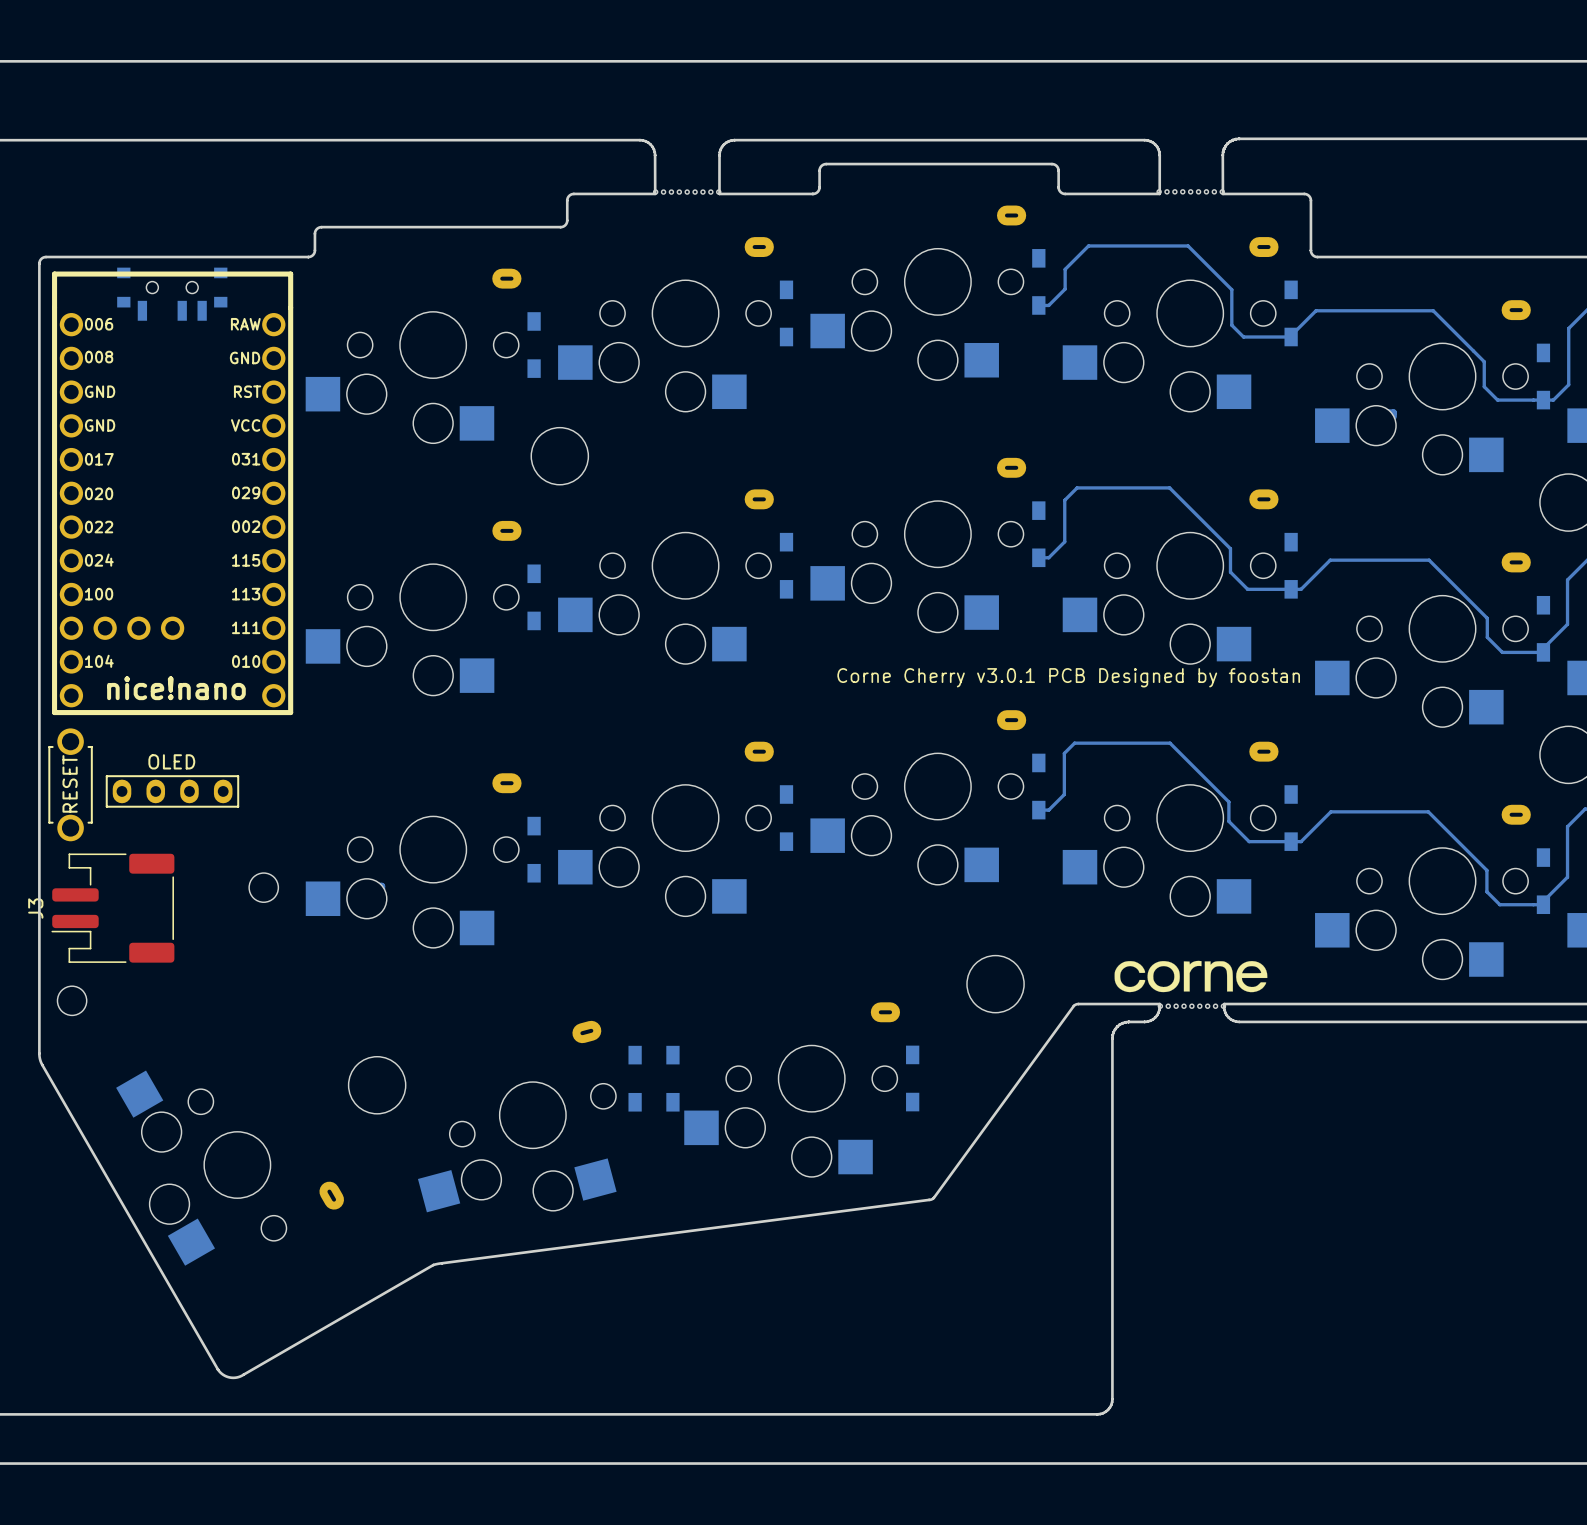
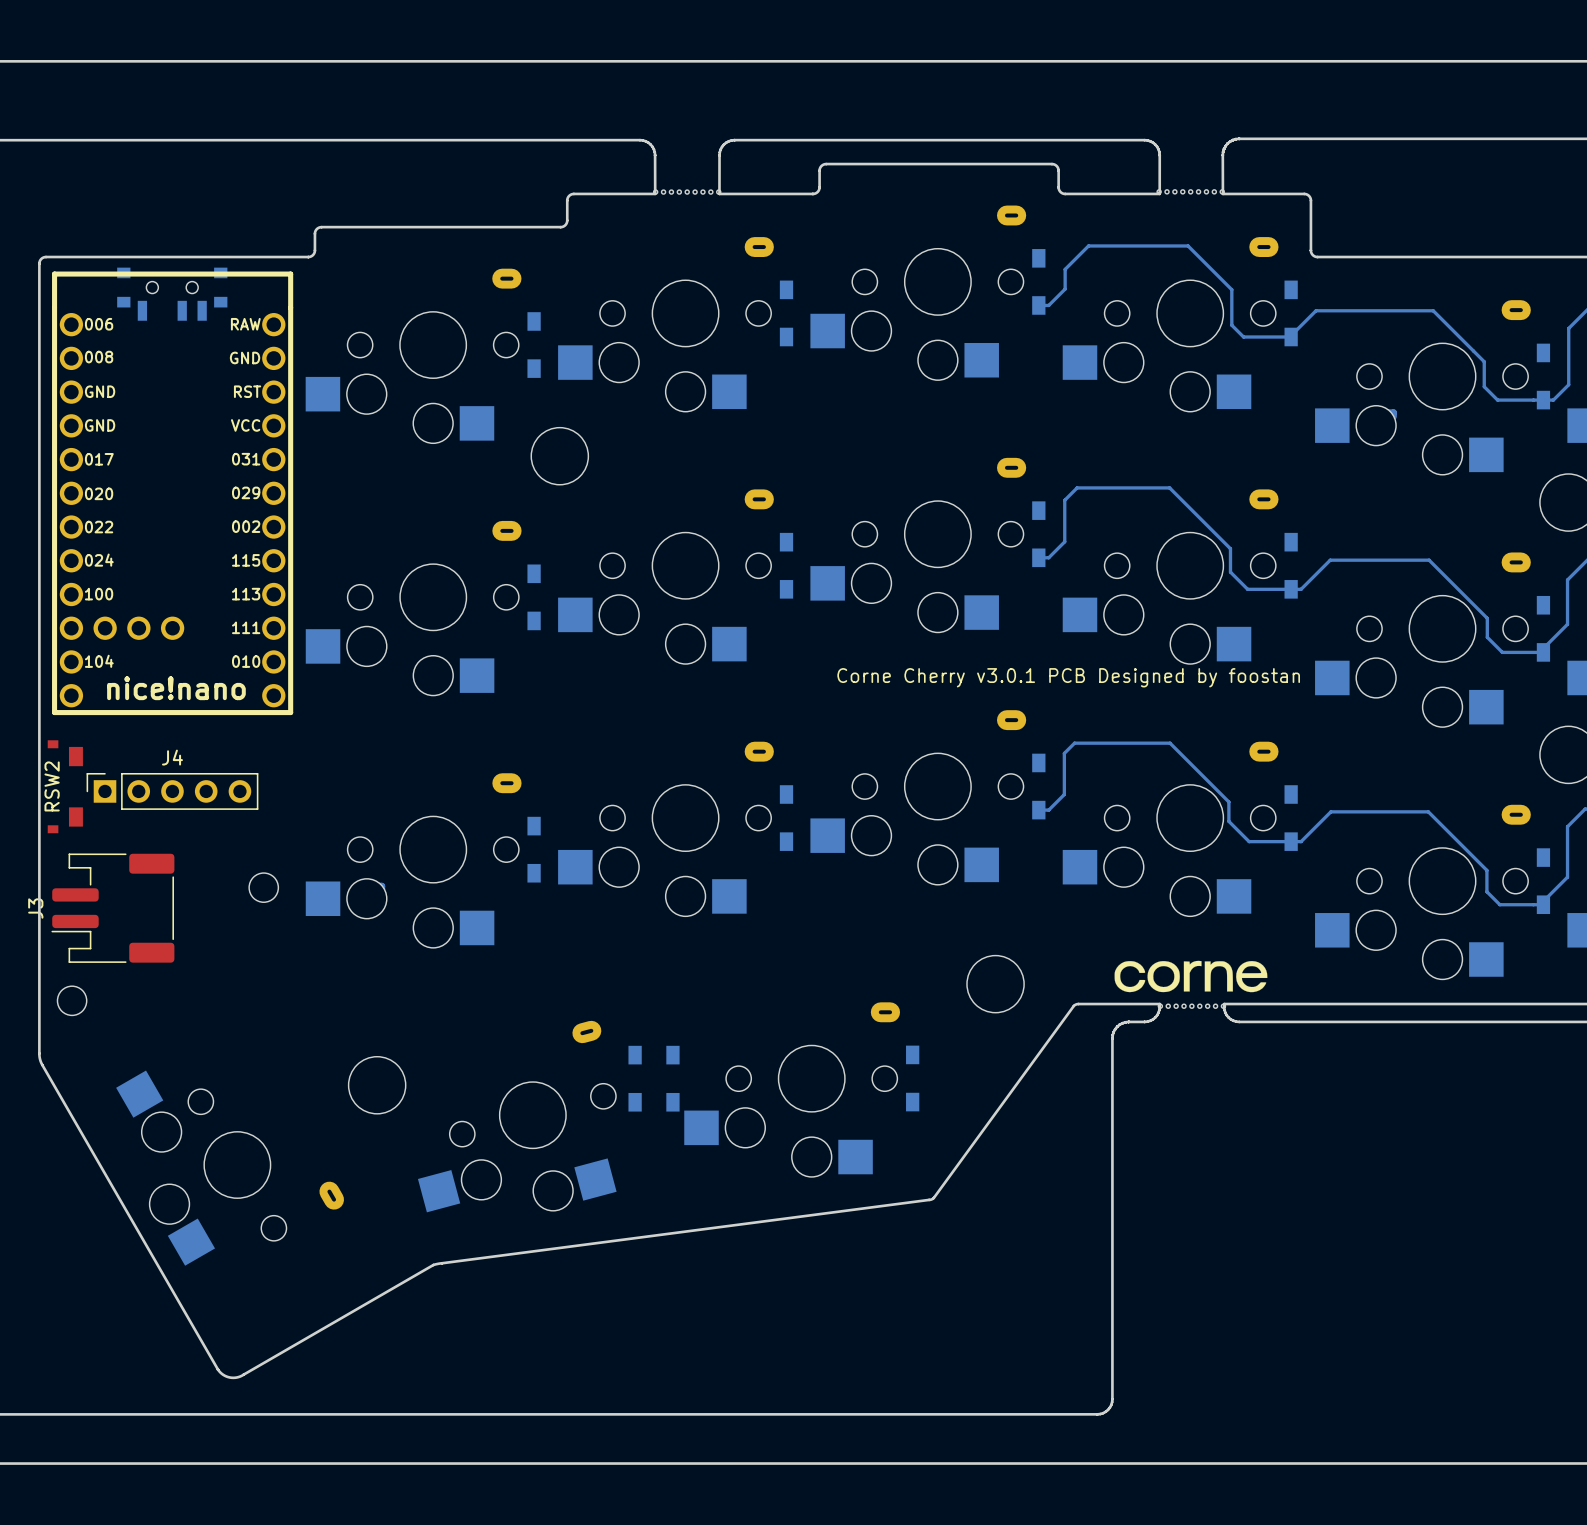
part: (70, 784) -> none
RSW2: none -> (65, 786)
part: (172, 791) -> none
J4: none -> (172, 791)

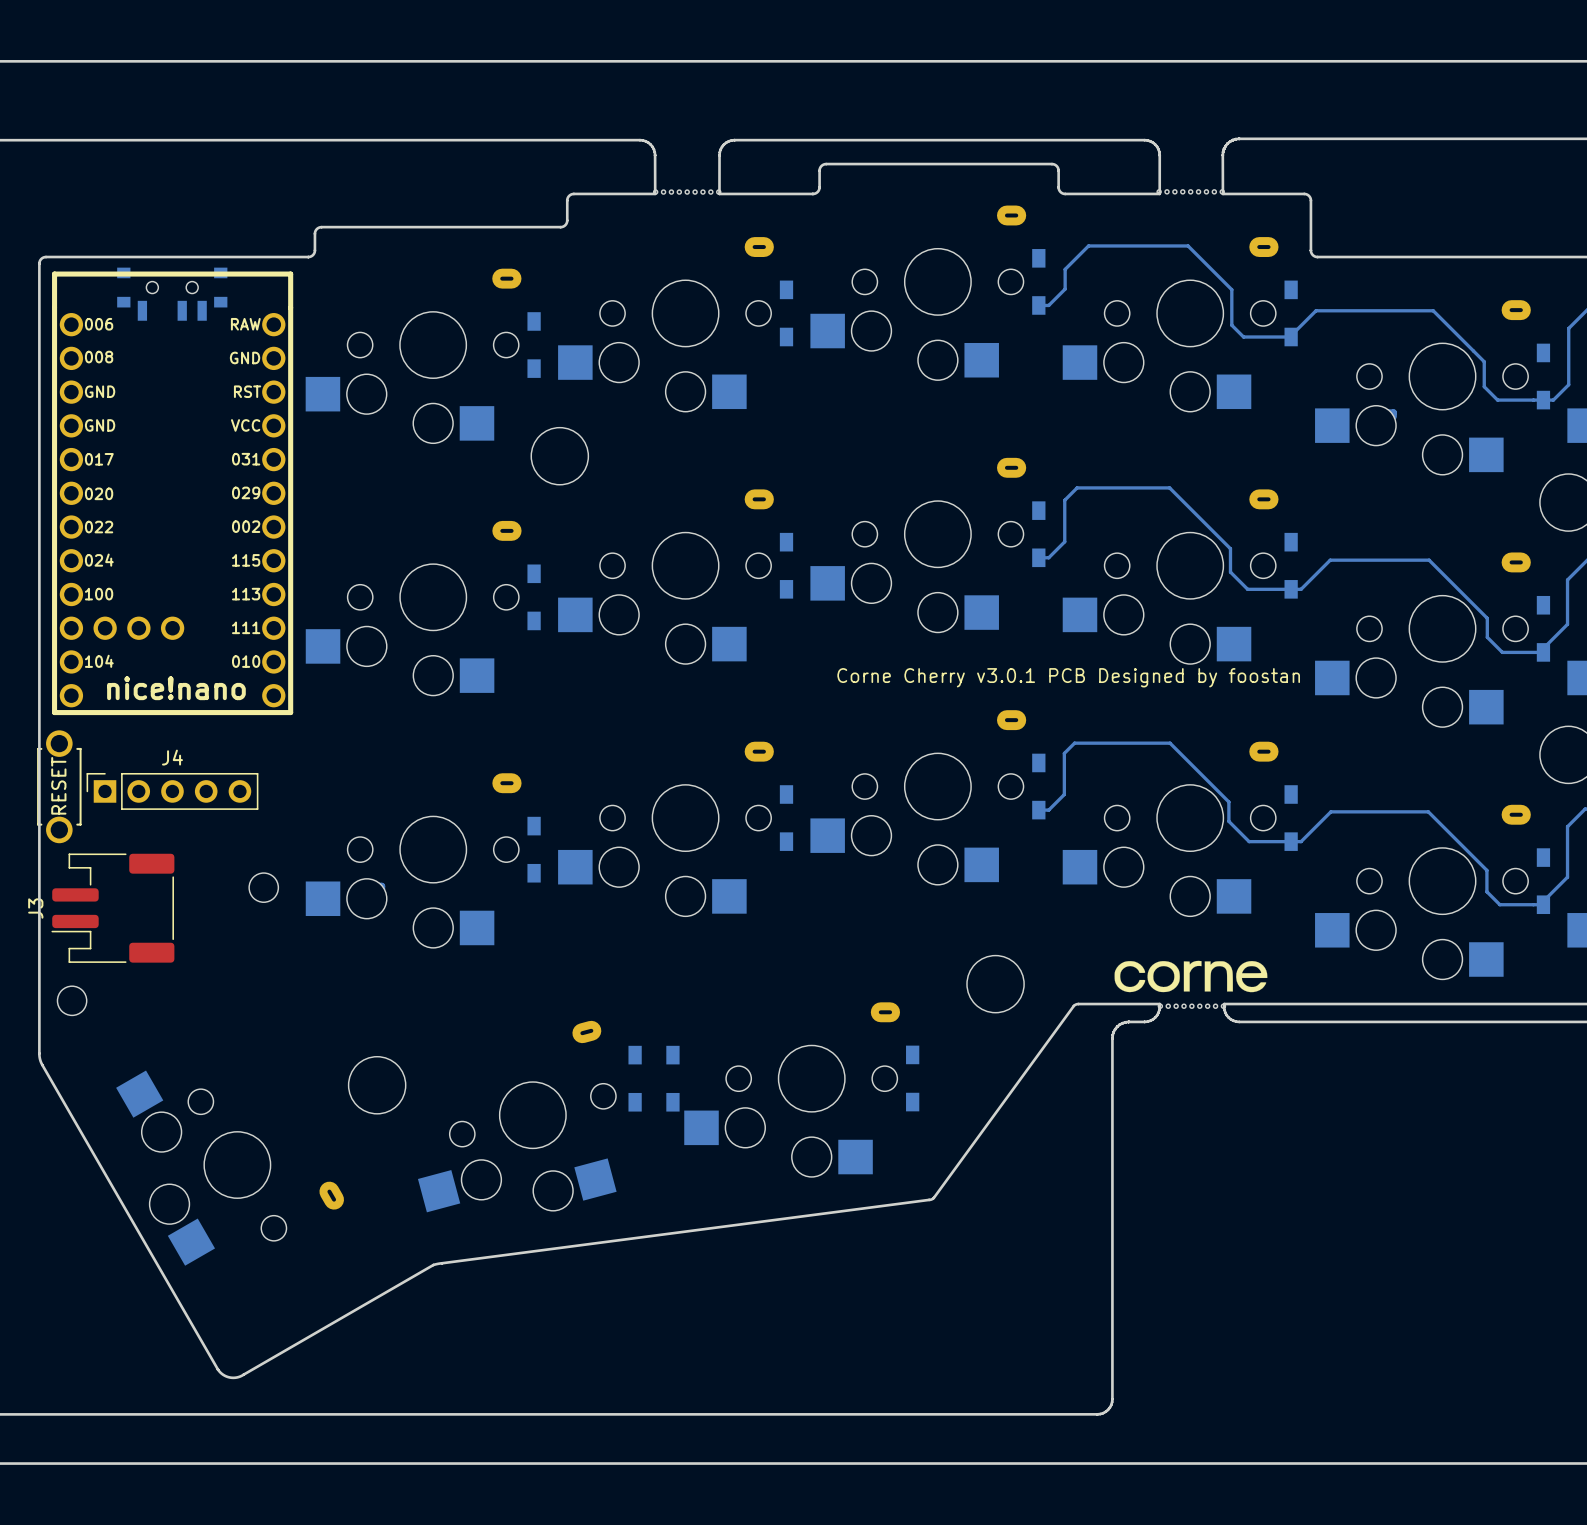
part: none -> (59, 786)
RSW2: (65, 786) -> none

